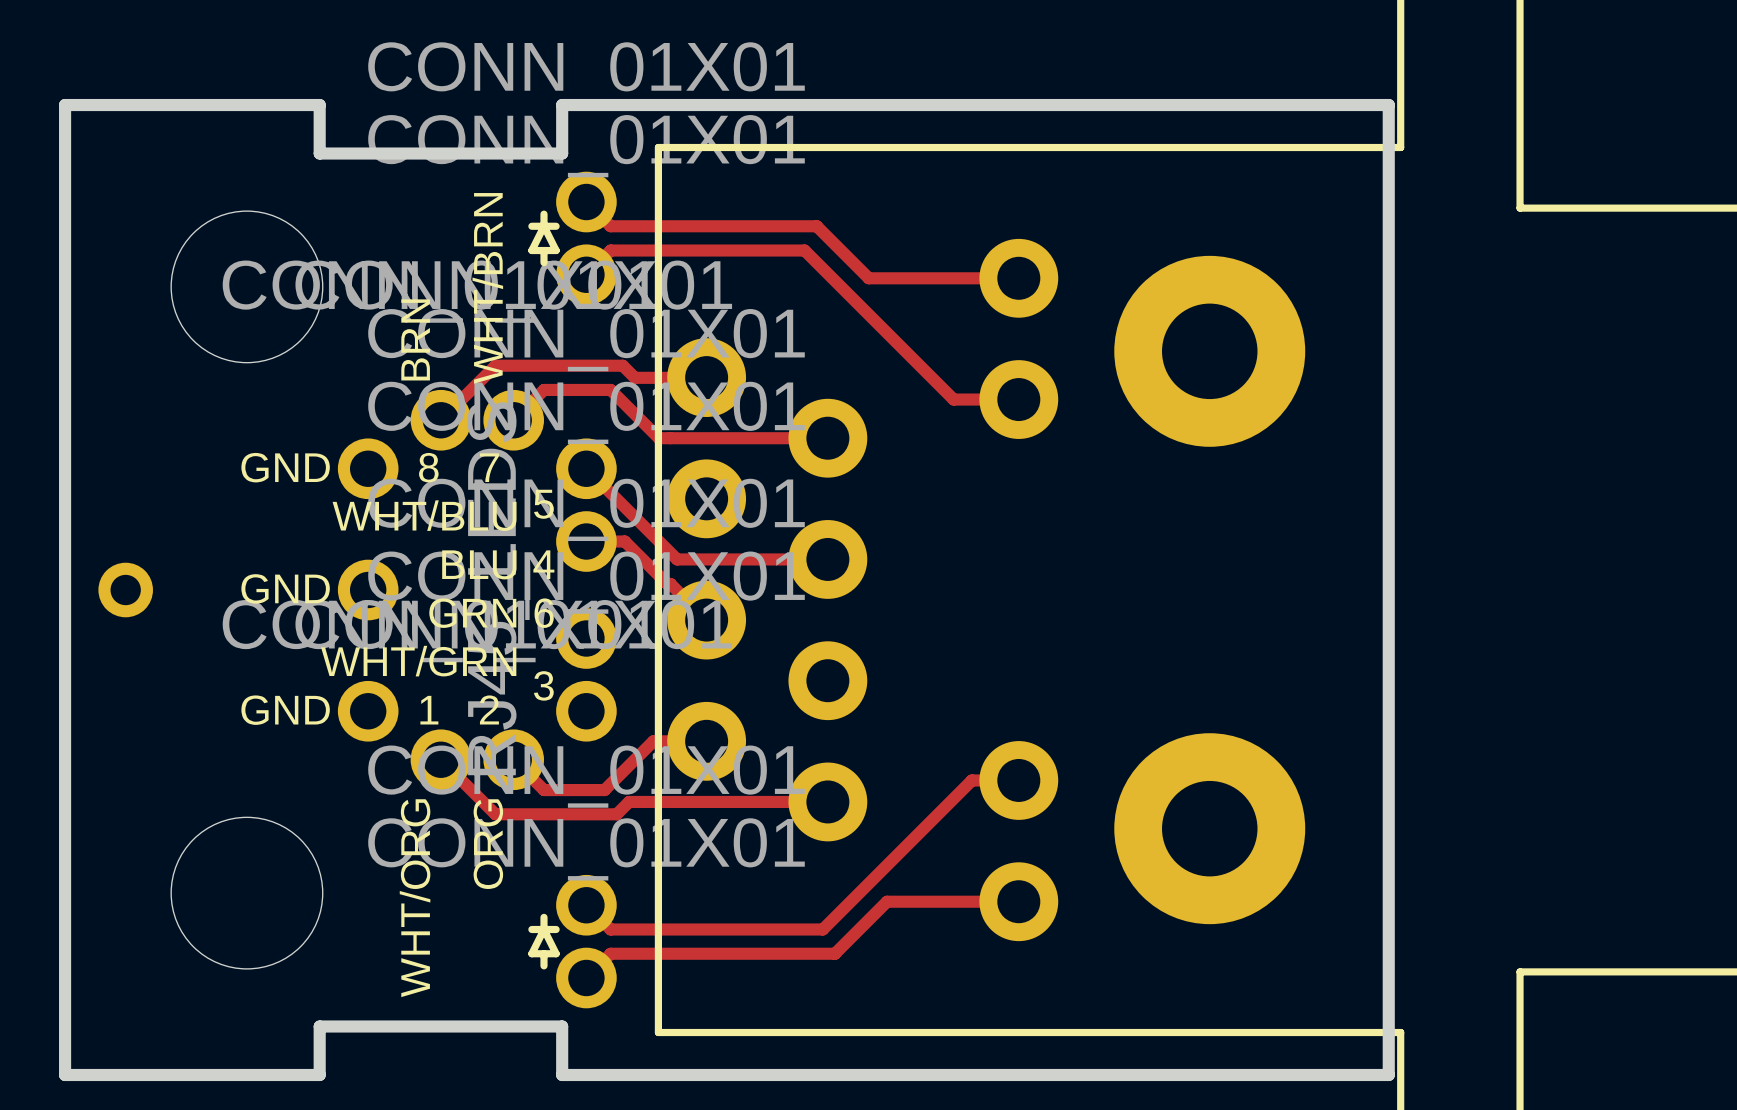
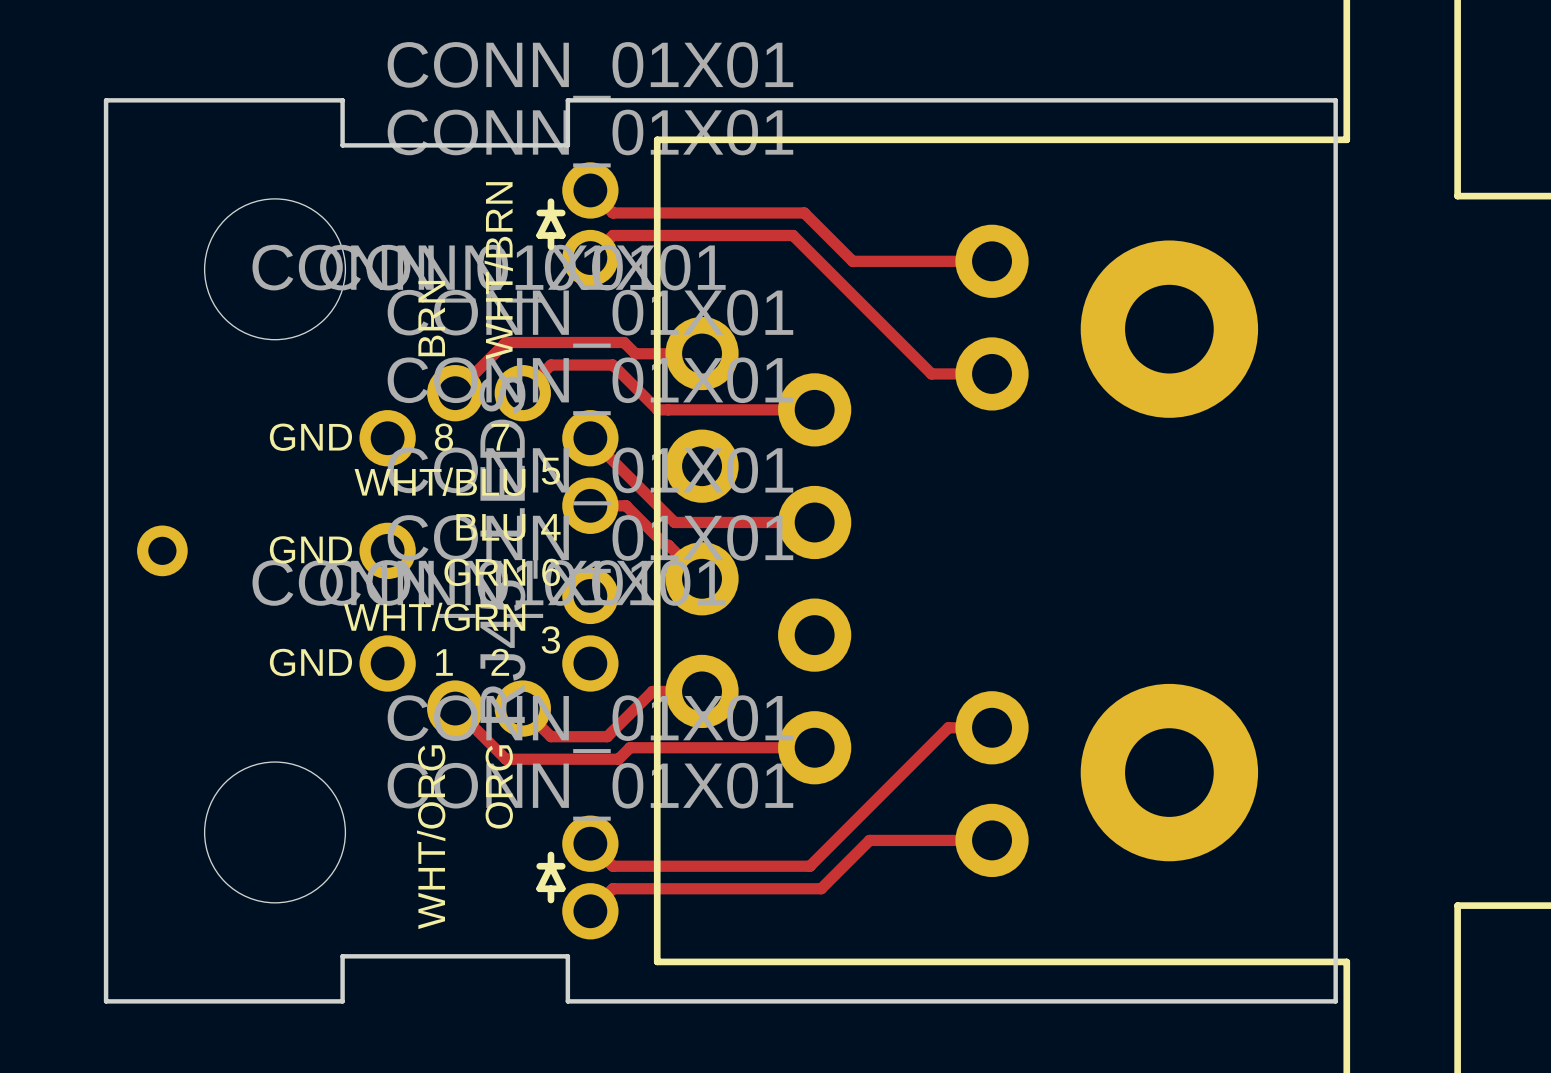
board edge width: thick (65, 105) (319, 105) (319, 153) (562, 153) (562, 105) (1388, 105) (1388, 1074) (562, 1074) (562, 1026) (319, 1026) (319, 1074) (65, 1074) (65, 105) -> thin (106, 100) (342, 100) (342, 145) (567, 145) (567, 100) (1335, 100) (1335, 1001) (567, 1001) (567, 956) (342, 956) (342, 1001) (106, 1001) (106, 100)

